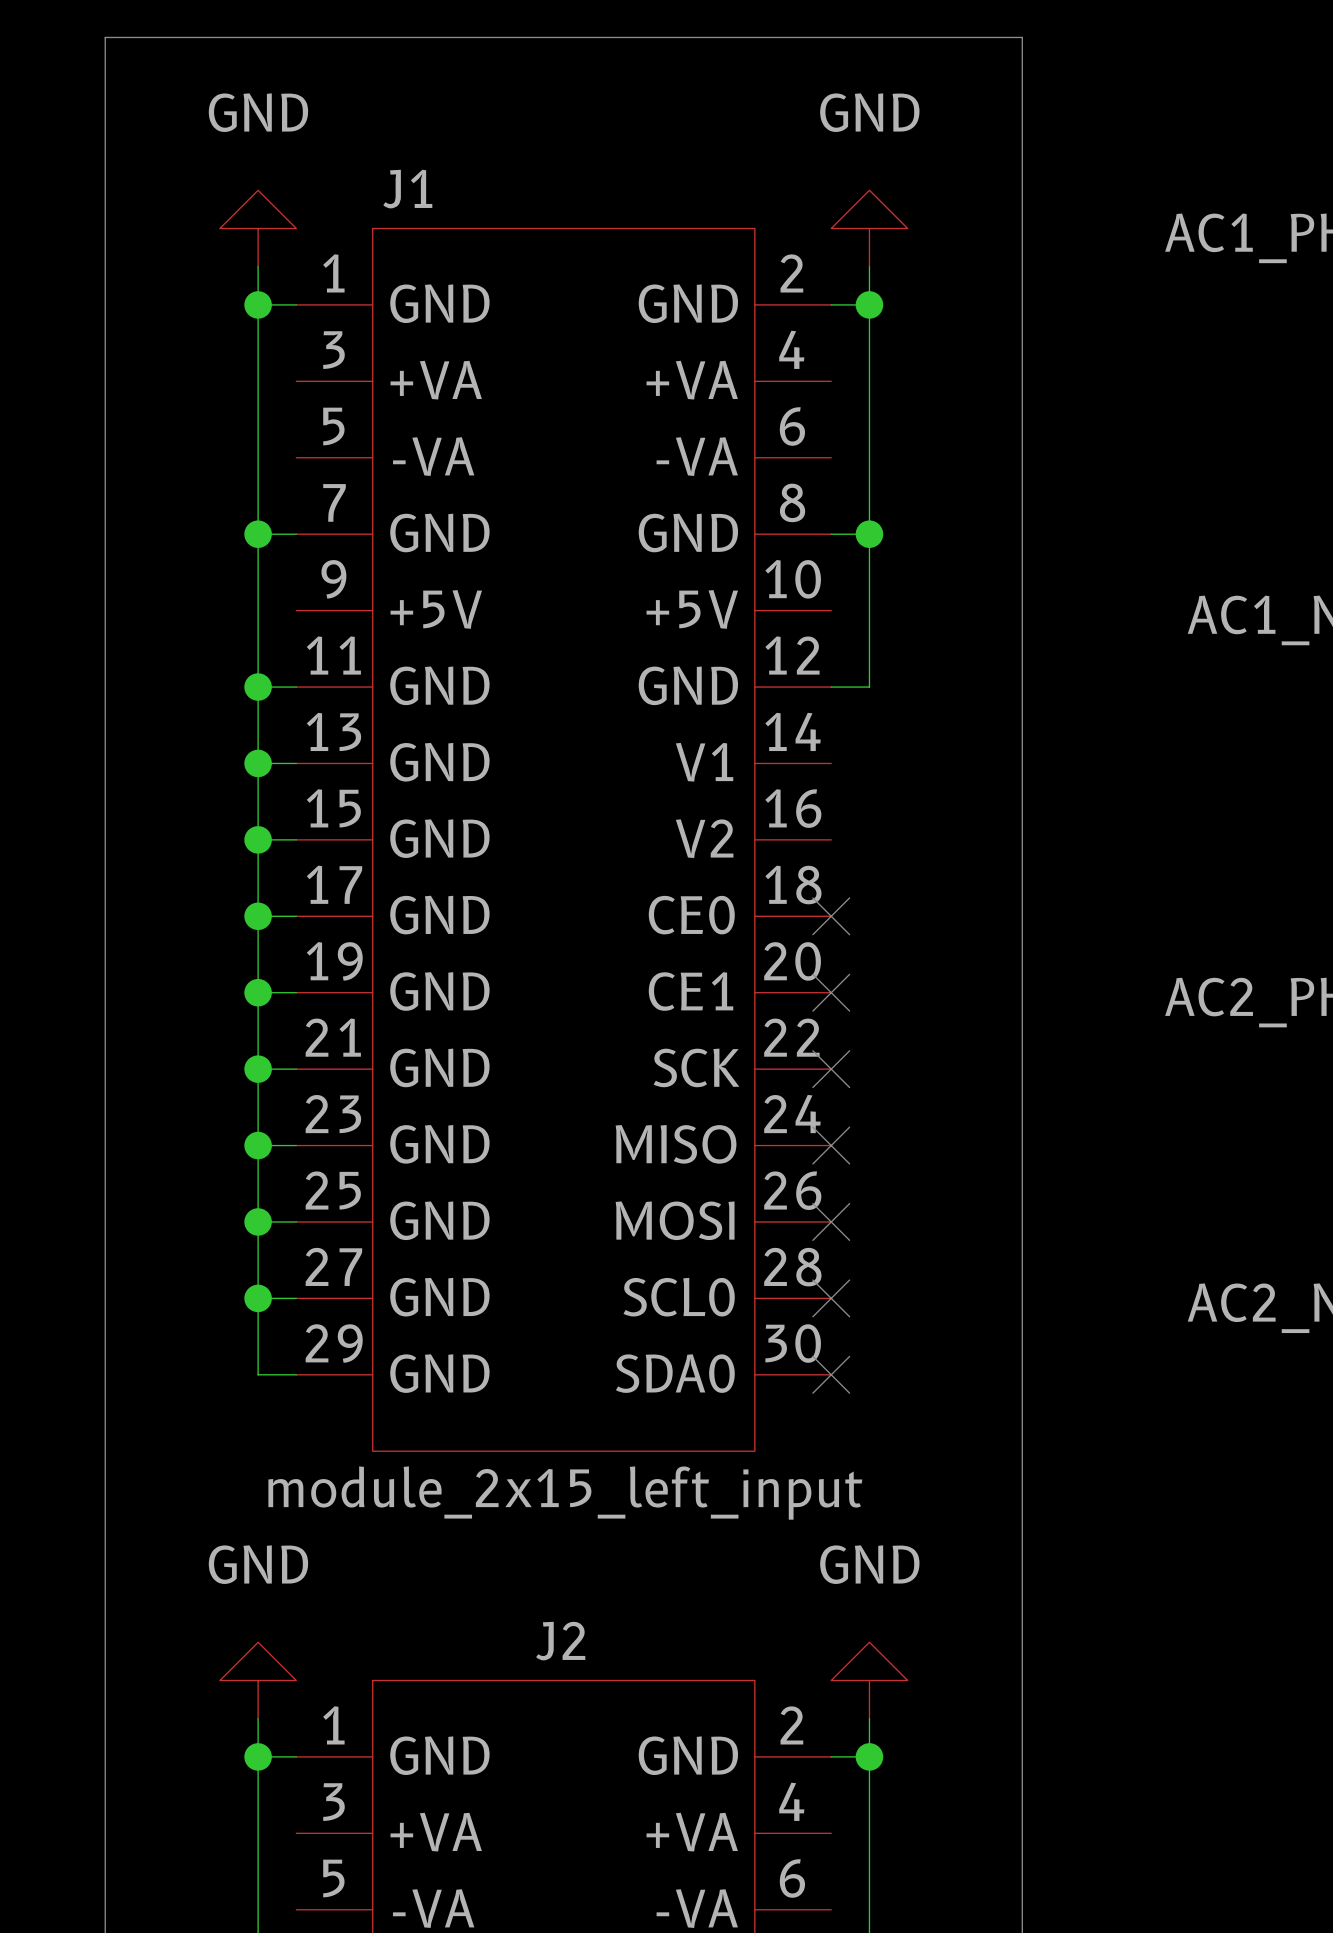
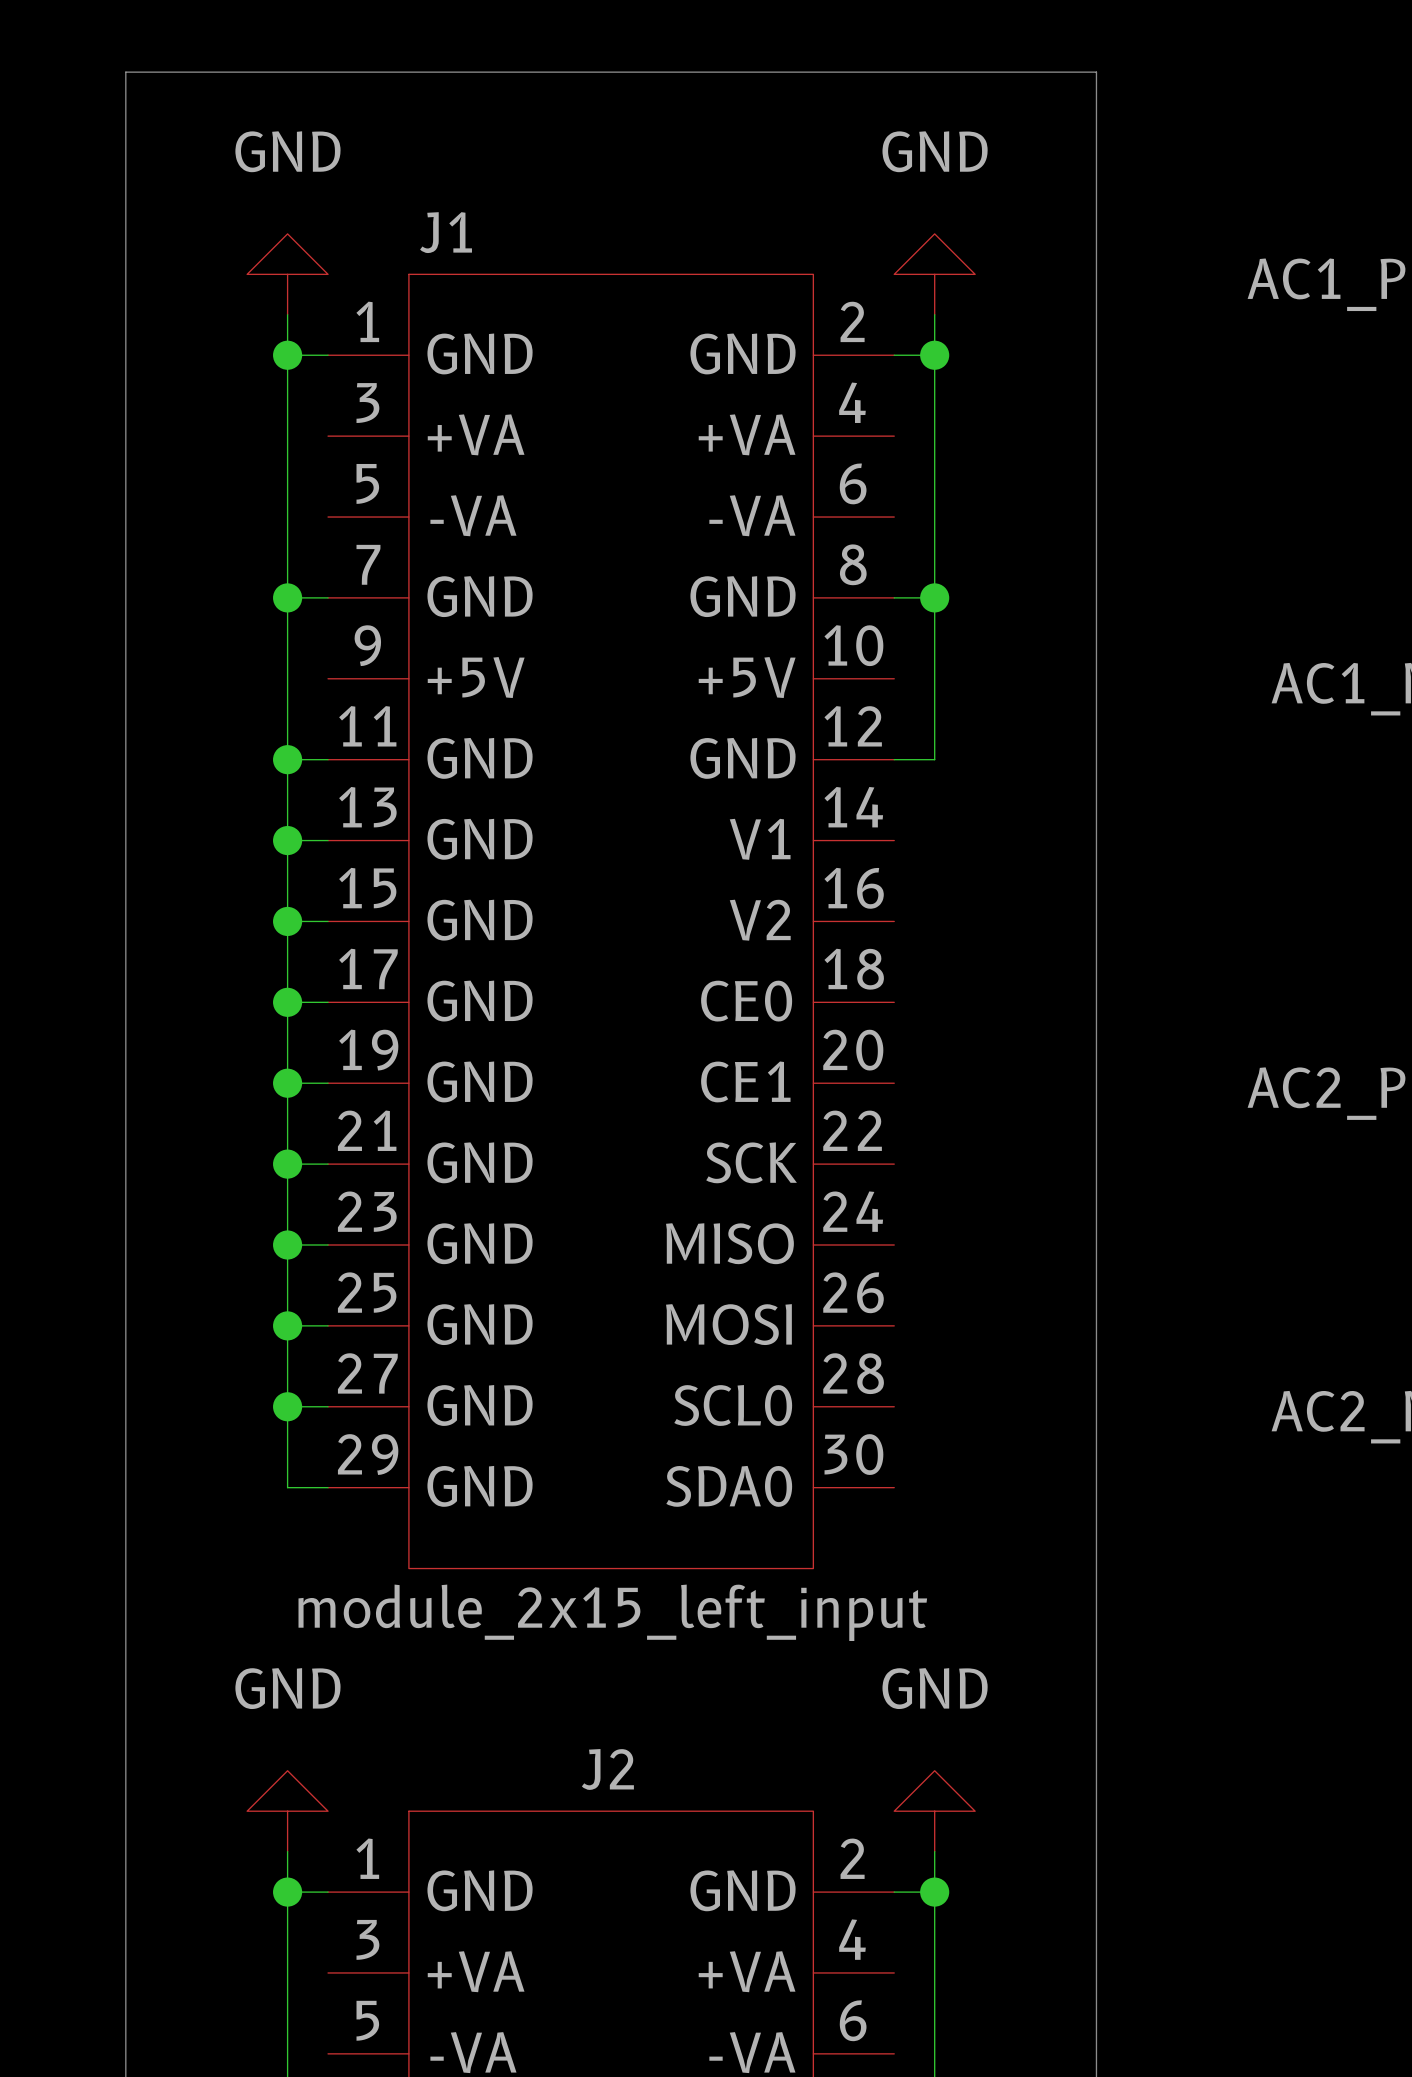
no-connect mark: (831, 916) -> none
no-connect mark: (831, 992) -> none
no-connect mark: (831, 1069) -> none
no-connect mark: (831, 1145) -> none
no-connect mark: (831, 1221) -> none
no-connect mark: (831, 1298) -> none
no-connect mark: (831, 1374) -> none

